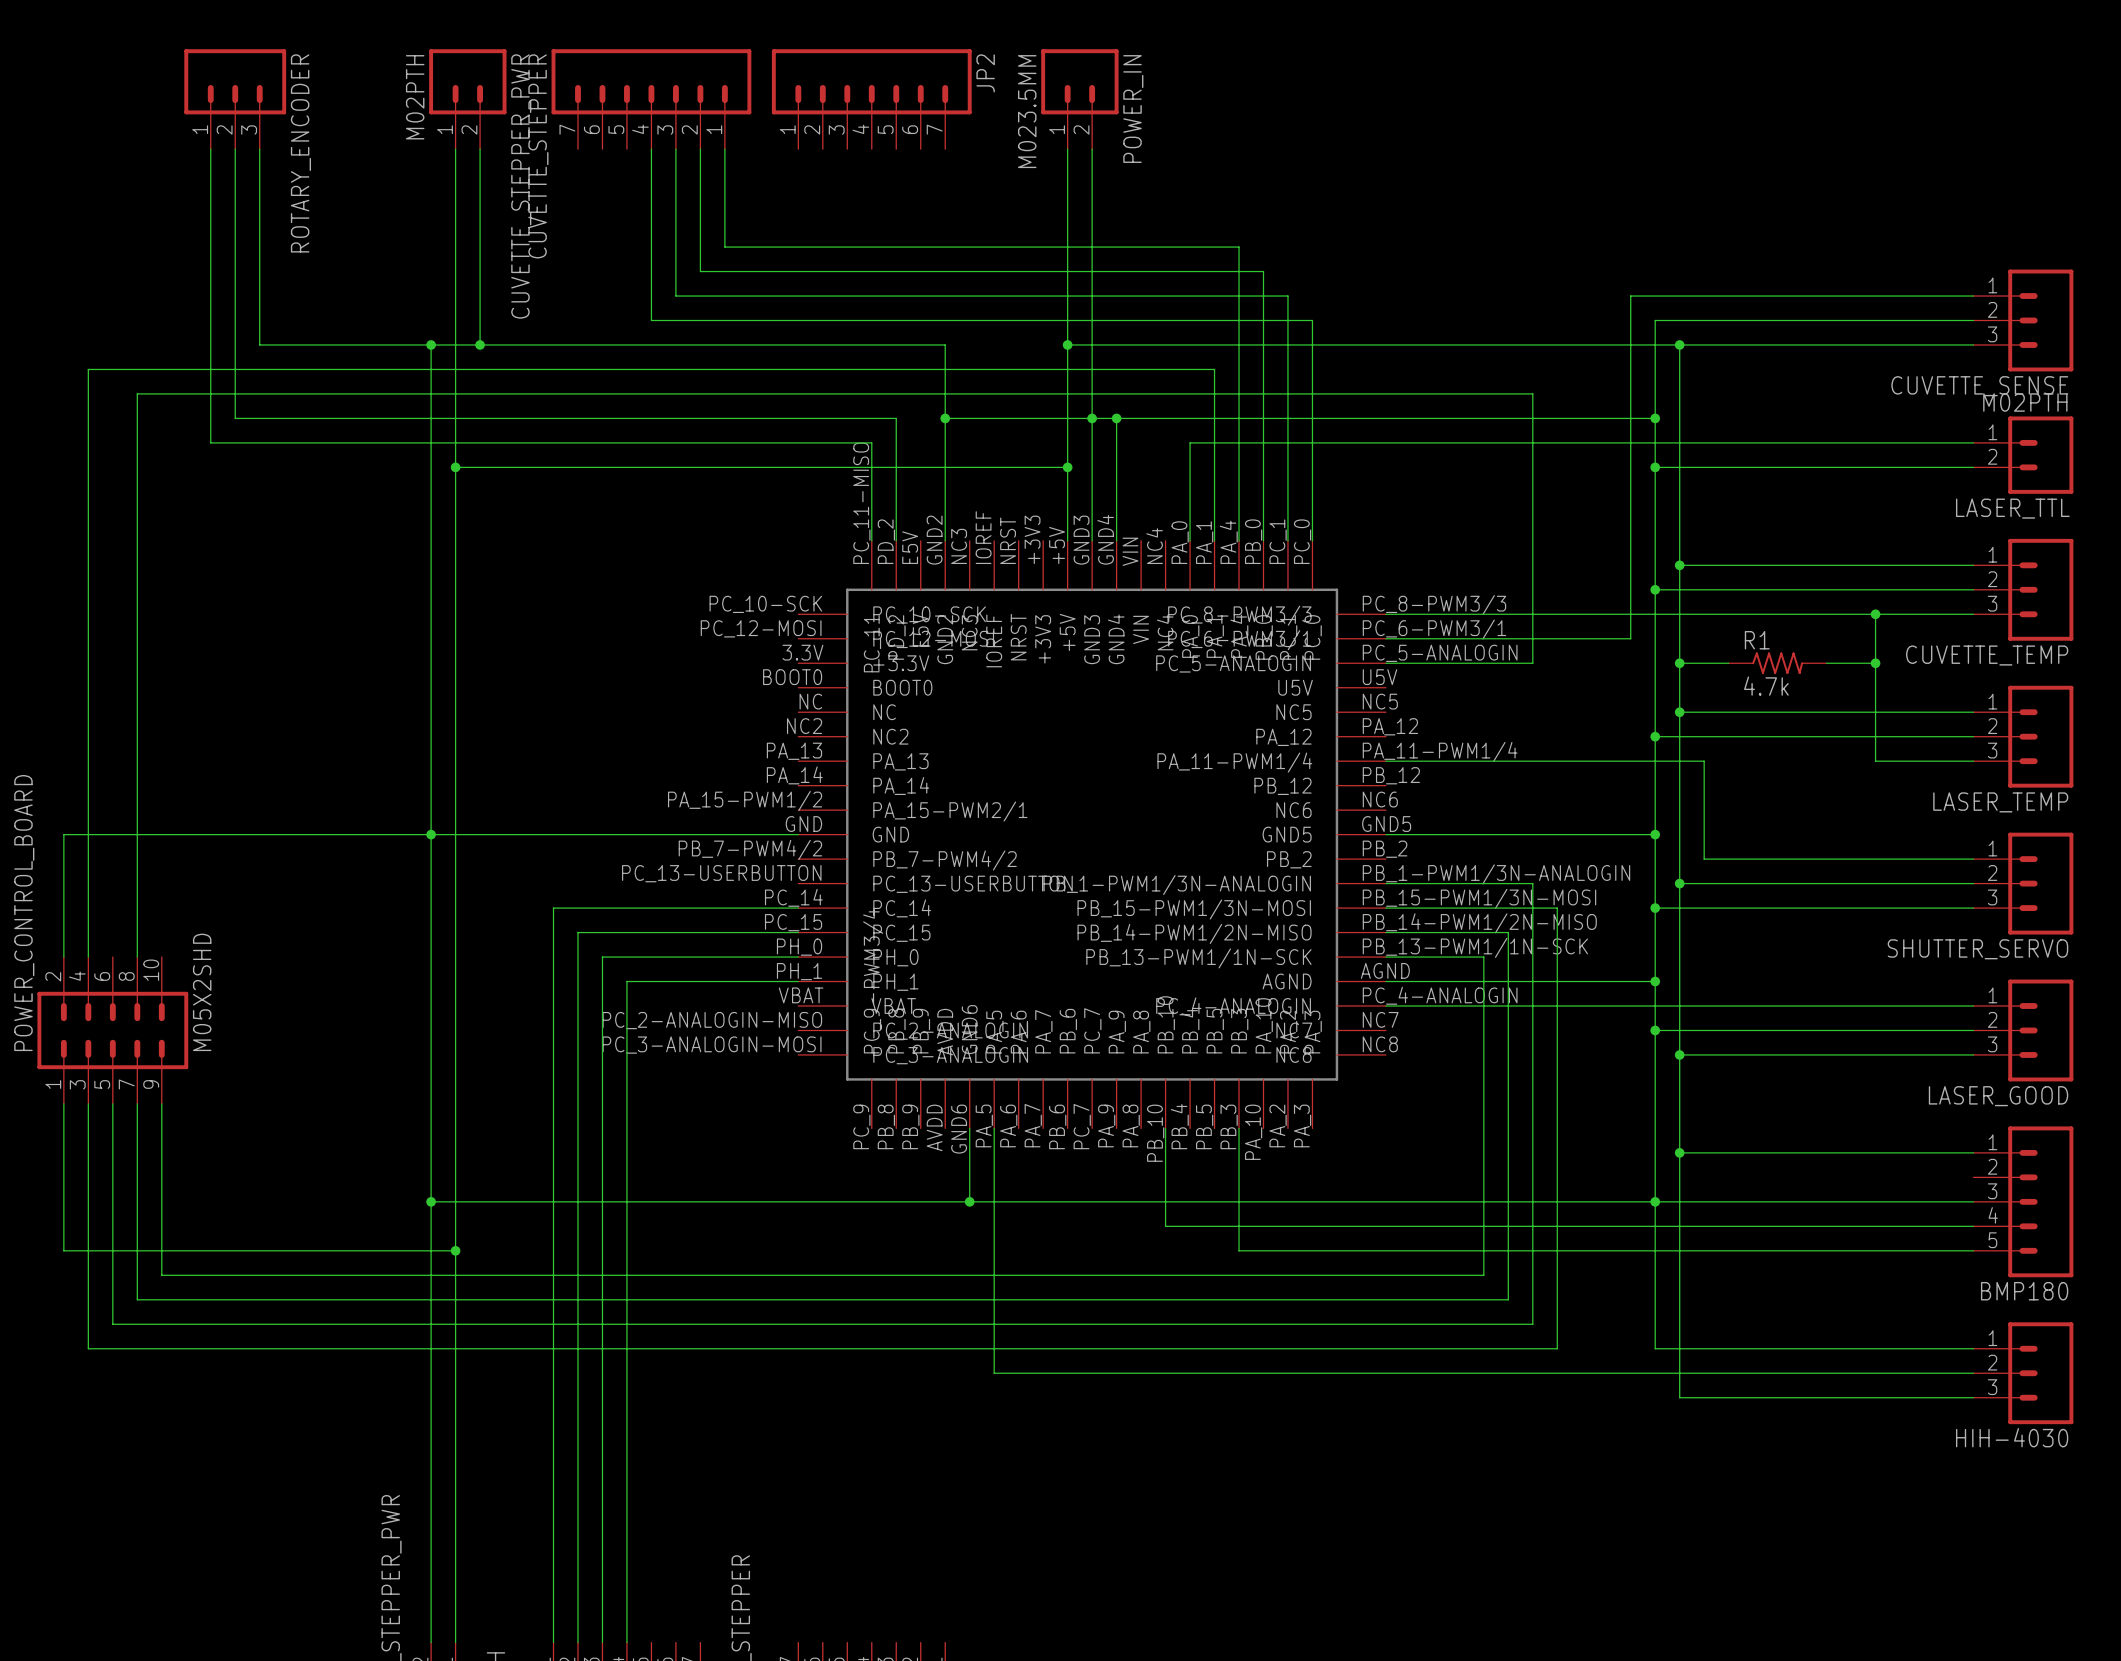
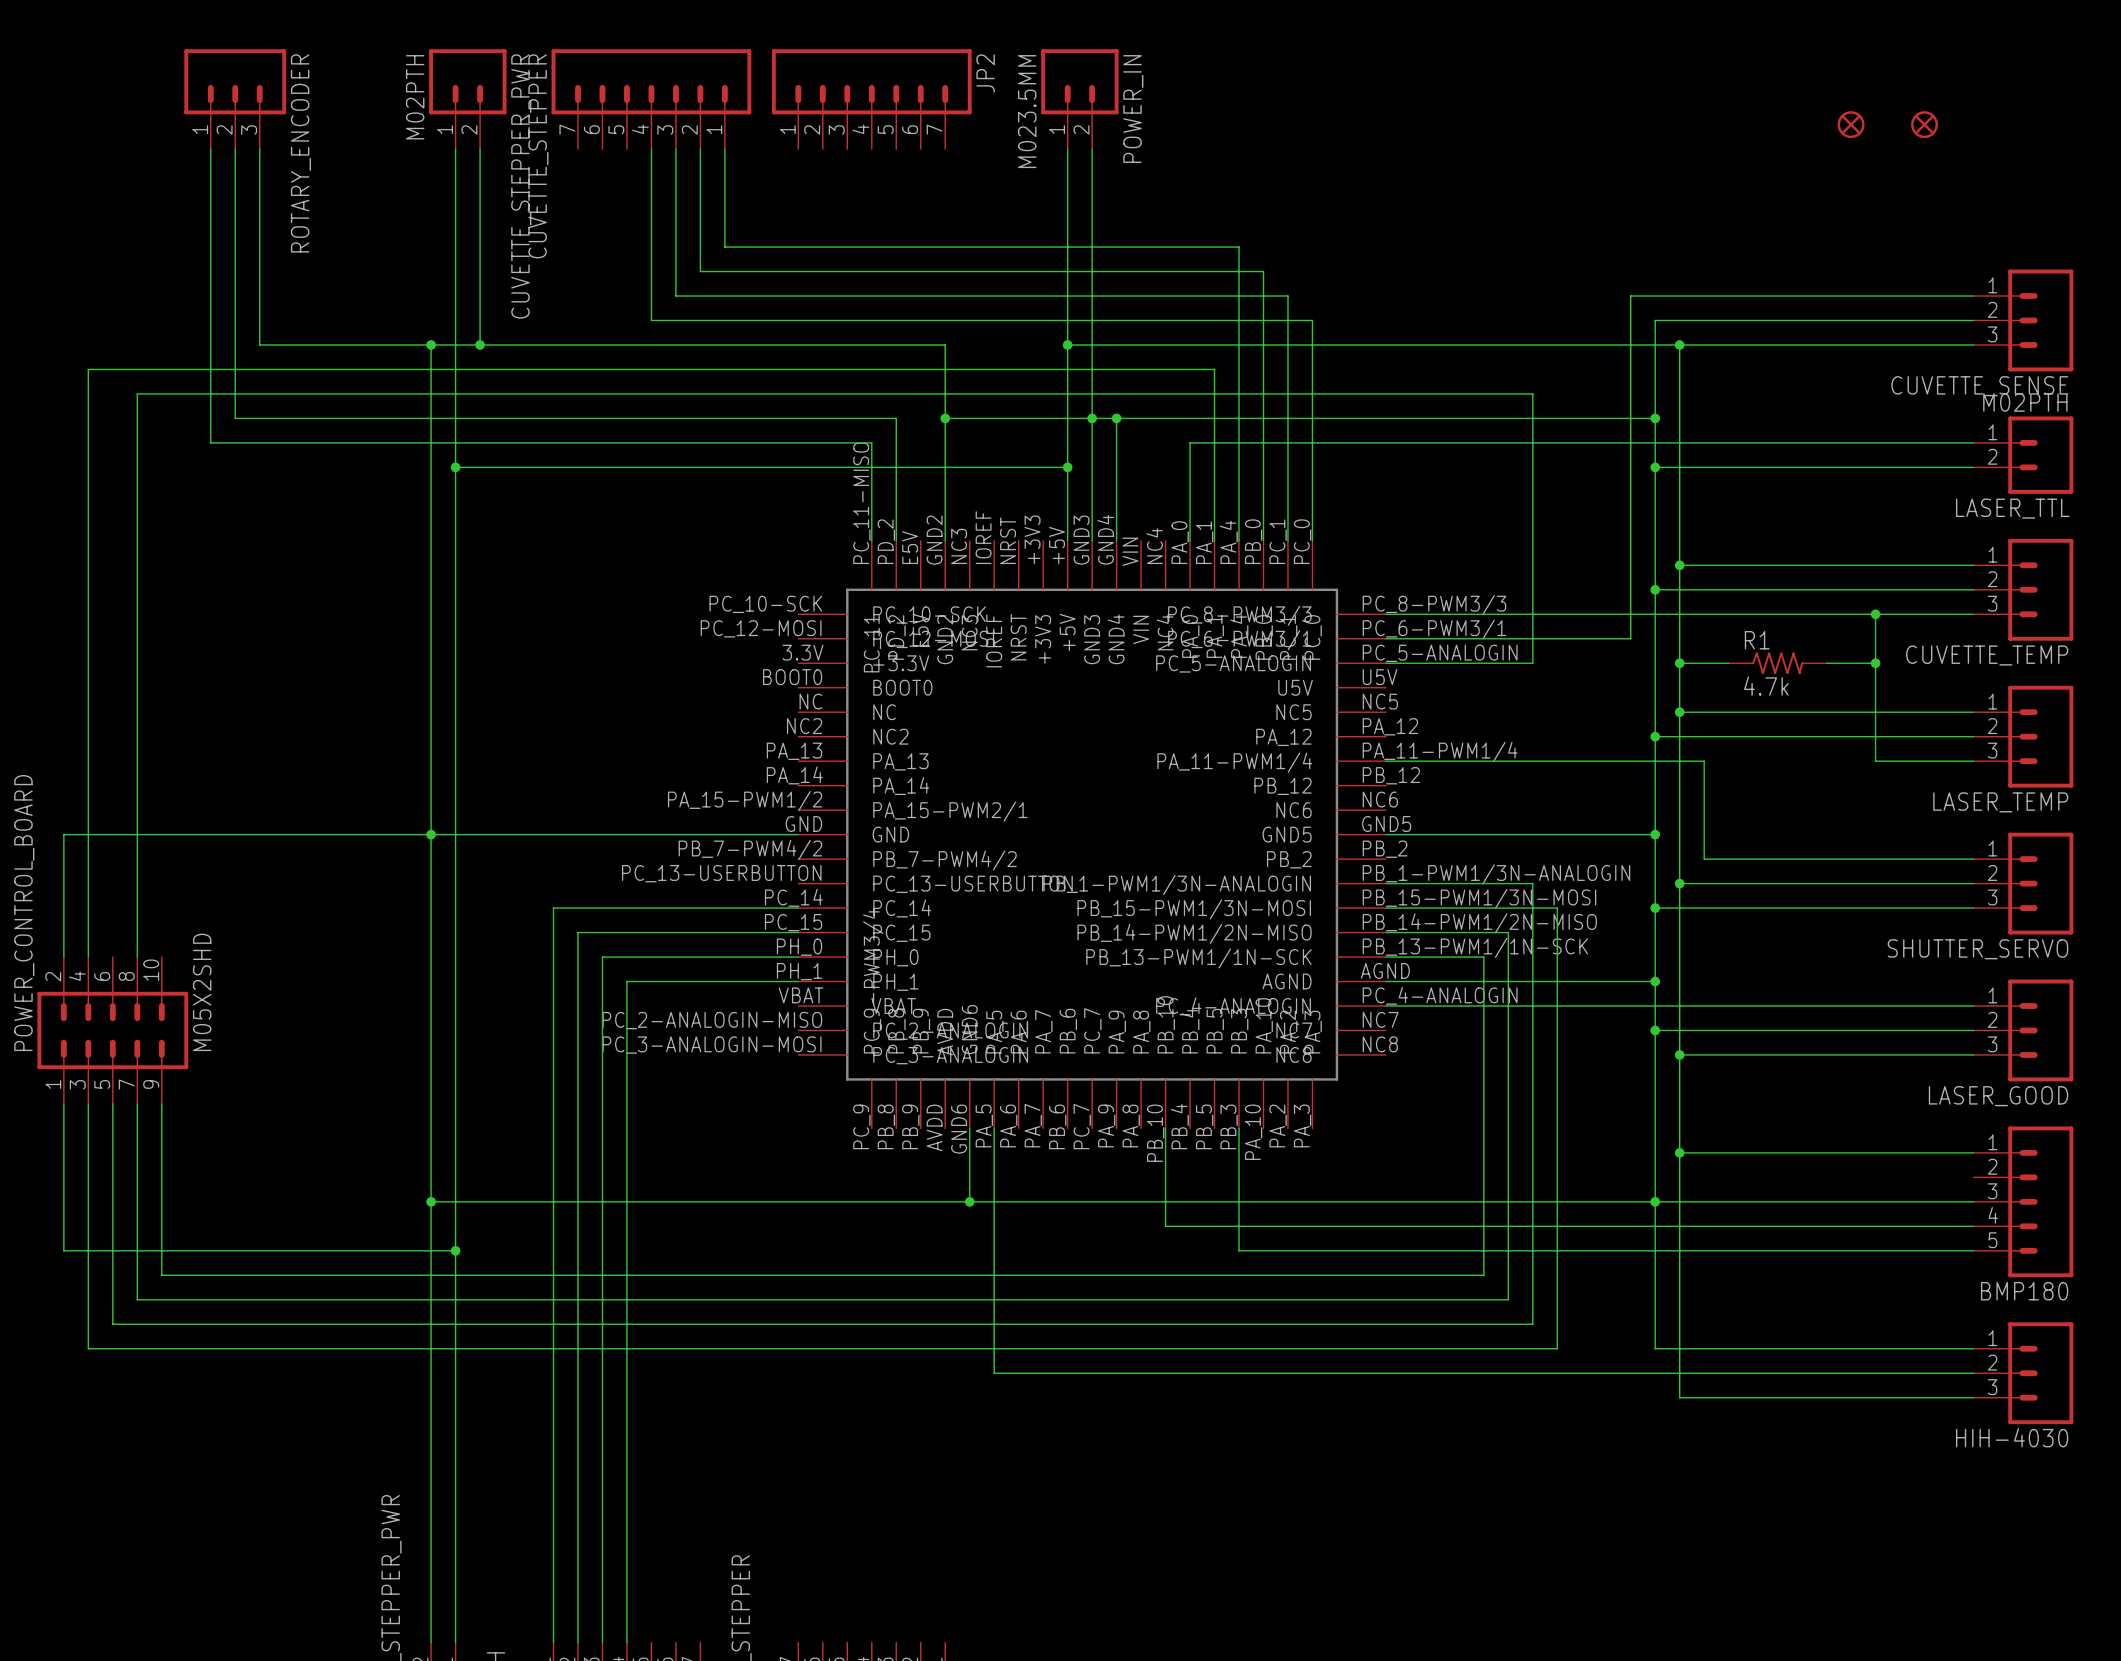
part: none -> (1851, 124)
part: none -> (1924, 124)

